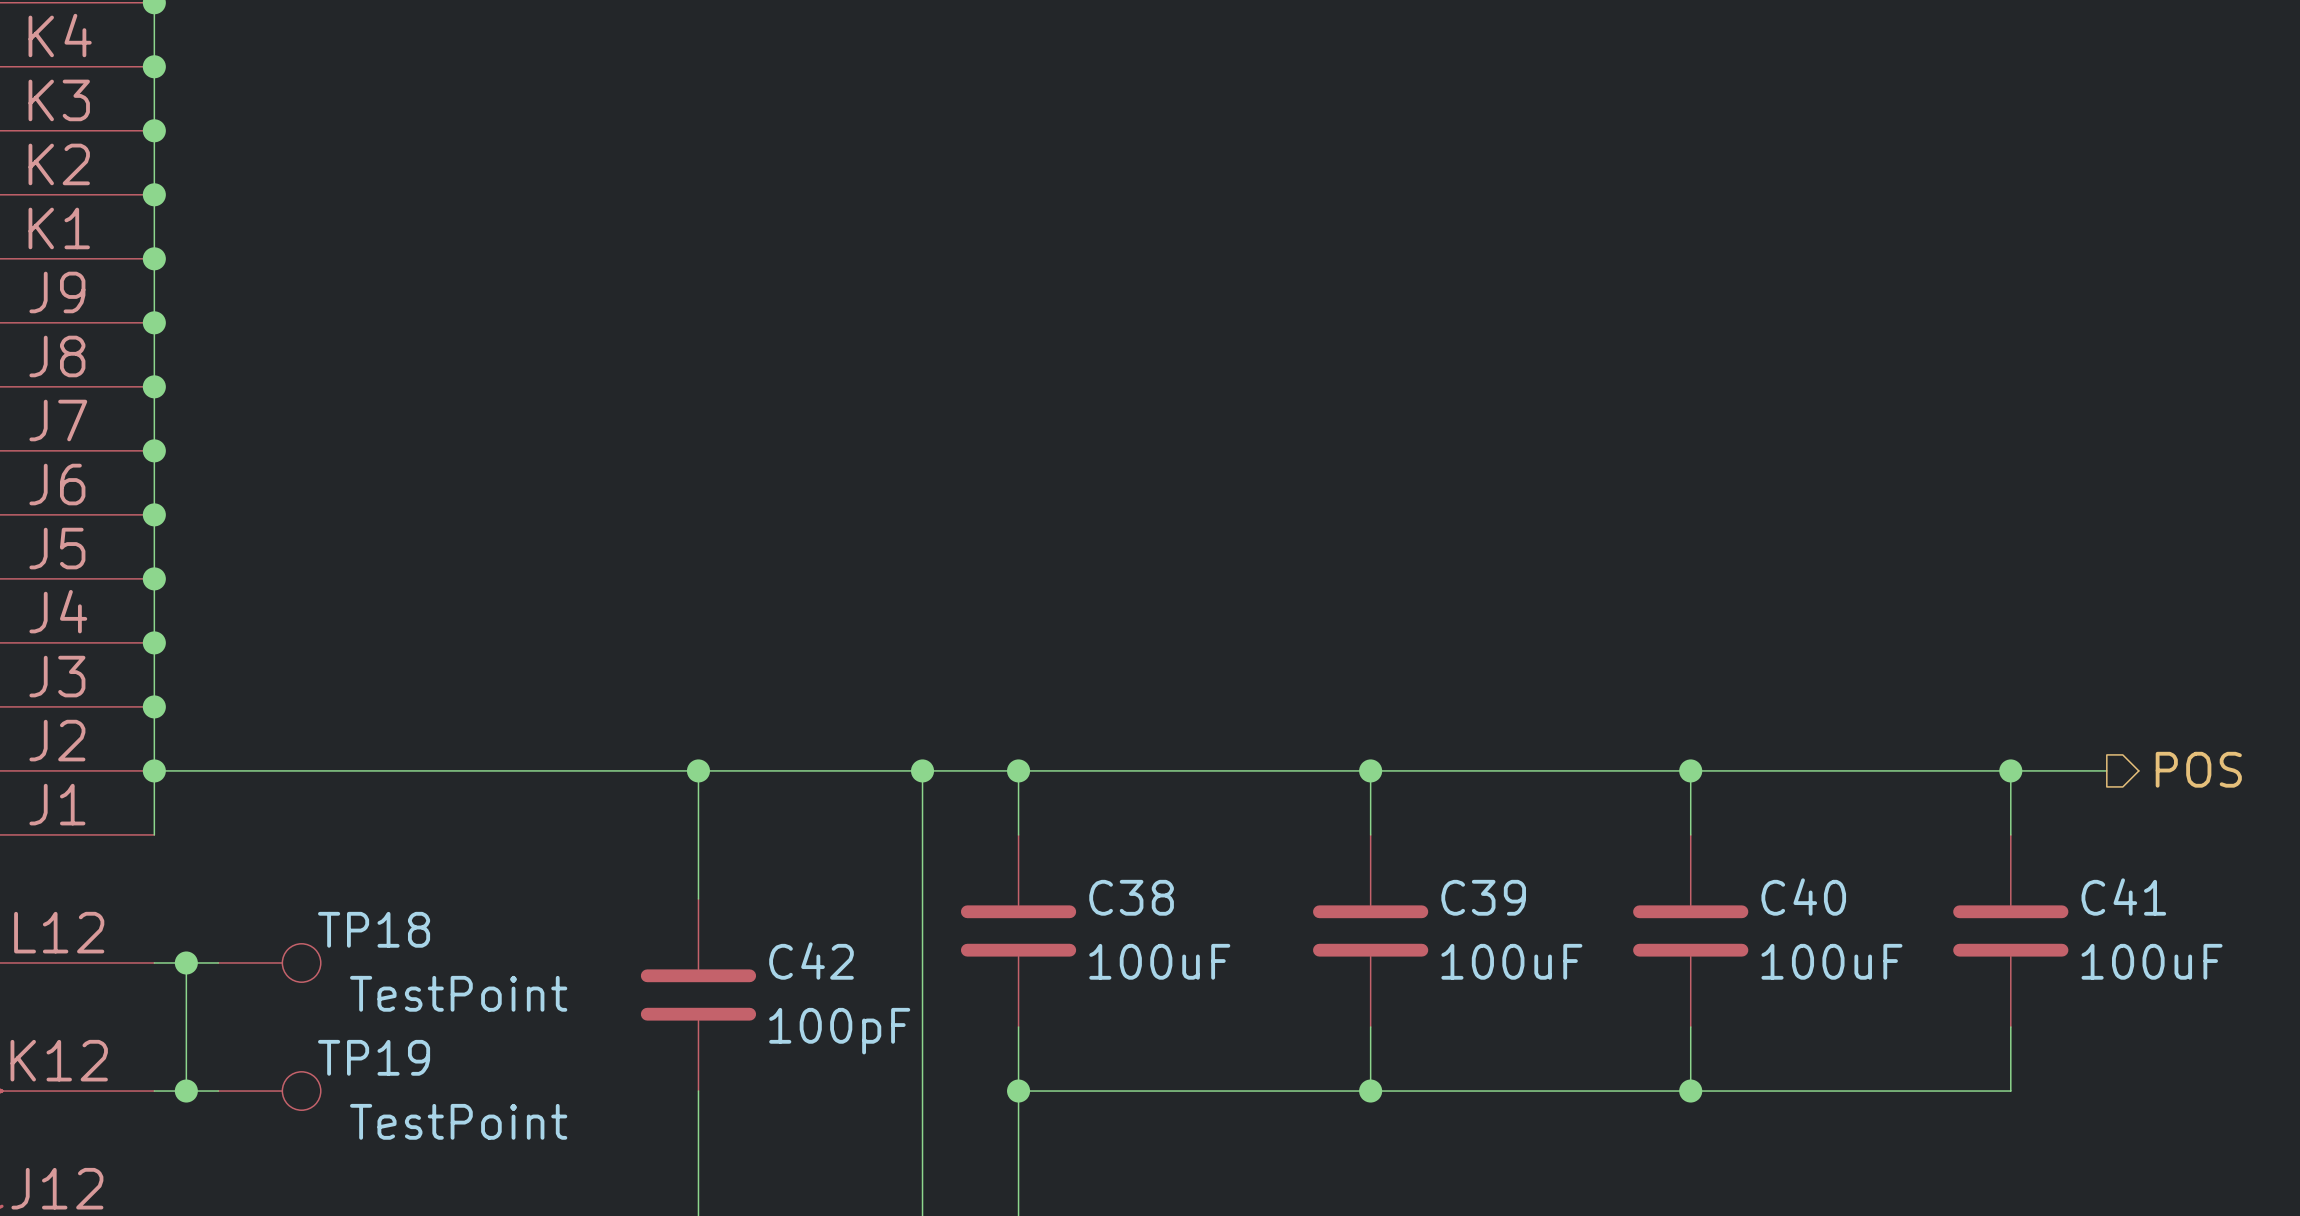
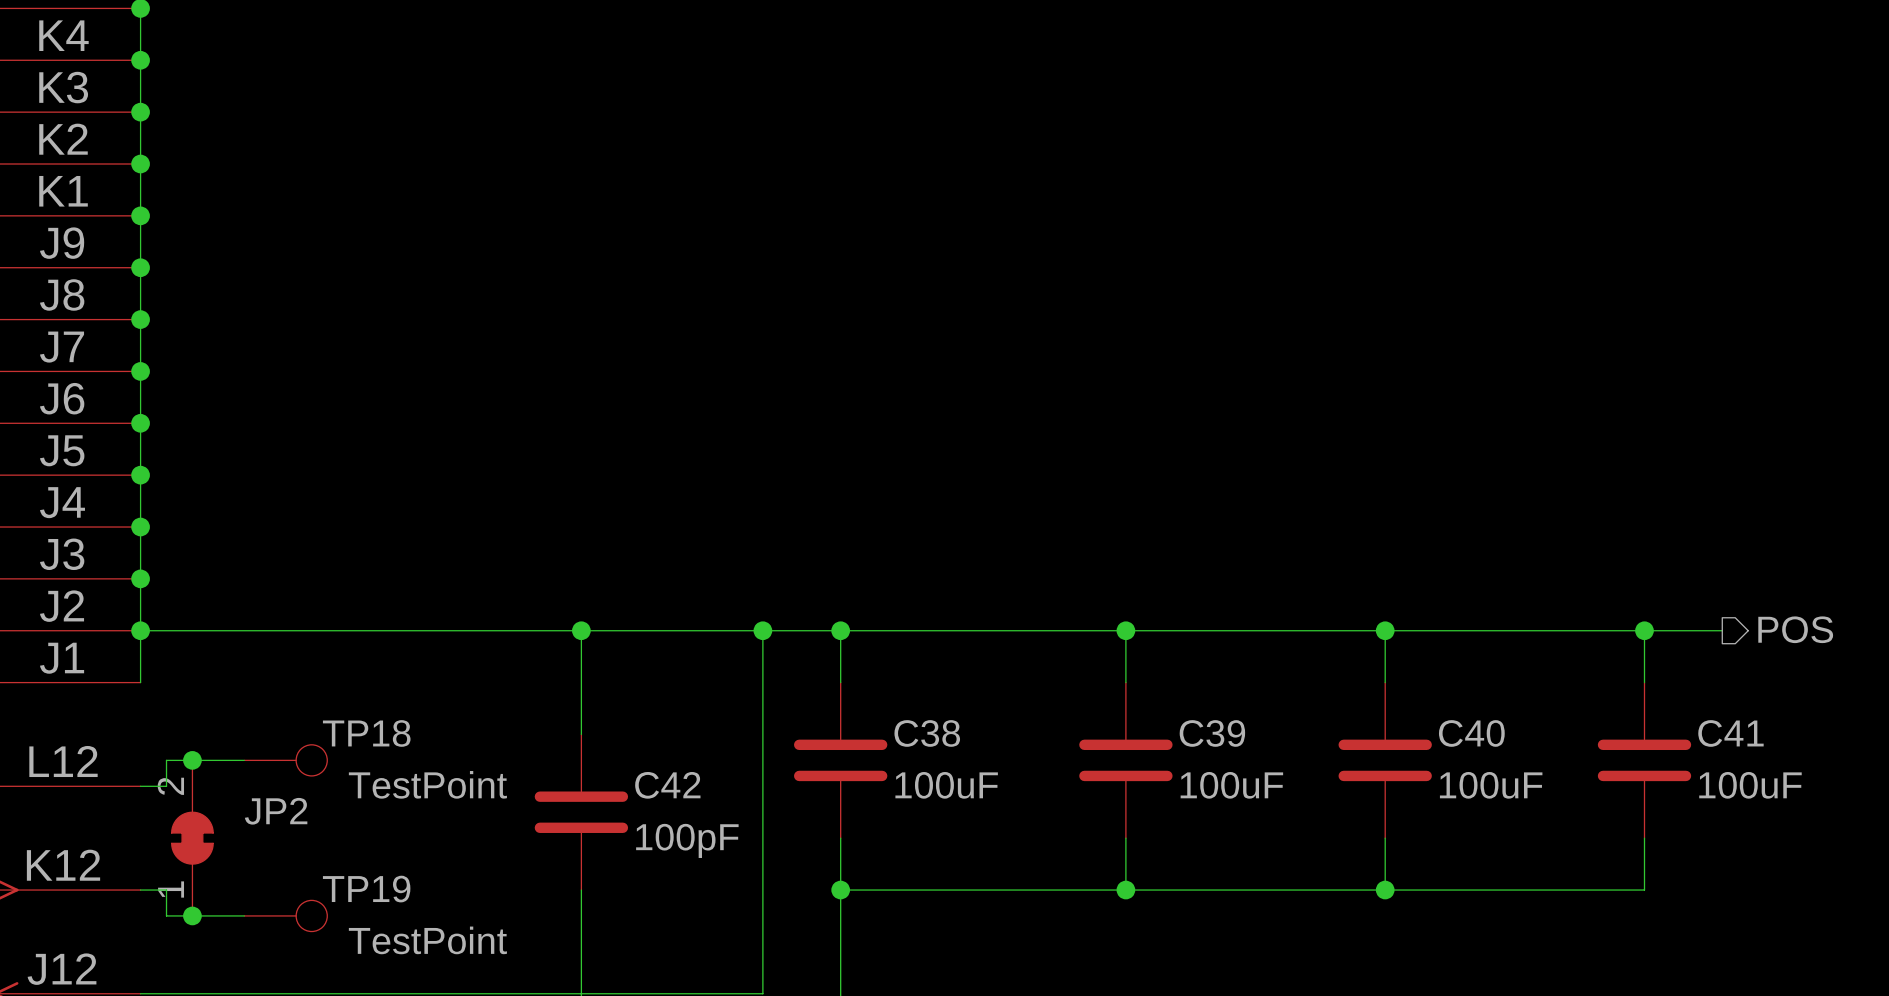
wire: none -> (244, 760) (166, 760) (166, 786)
junction position: (186, 962) -> (192, 760)
wire: (218, 962) (186, 962) (186, 1091) (218, 1091) -> none
TP18 position: (269, 962) -> (285, 760)
JP2: none -> (192, 838)
wire: none -> (166, 890) (166, 915) (244, 915)
junction position: (186, 1091) -> (192, 915)
TP19 position: (269, 1091) -> (285, 915)

